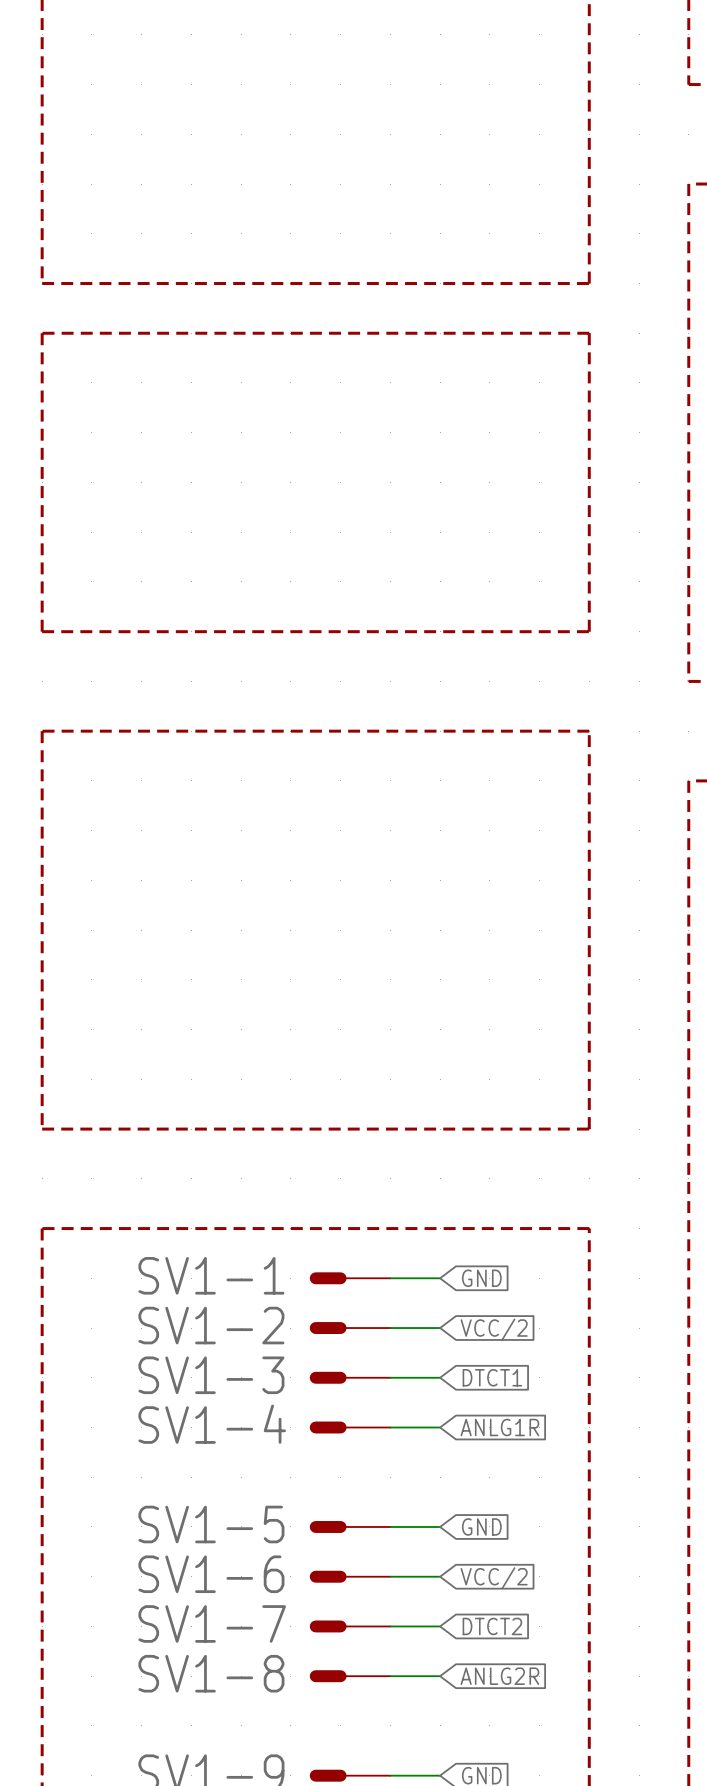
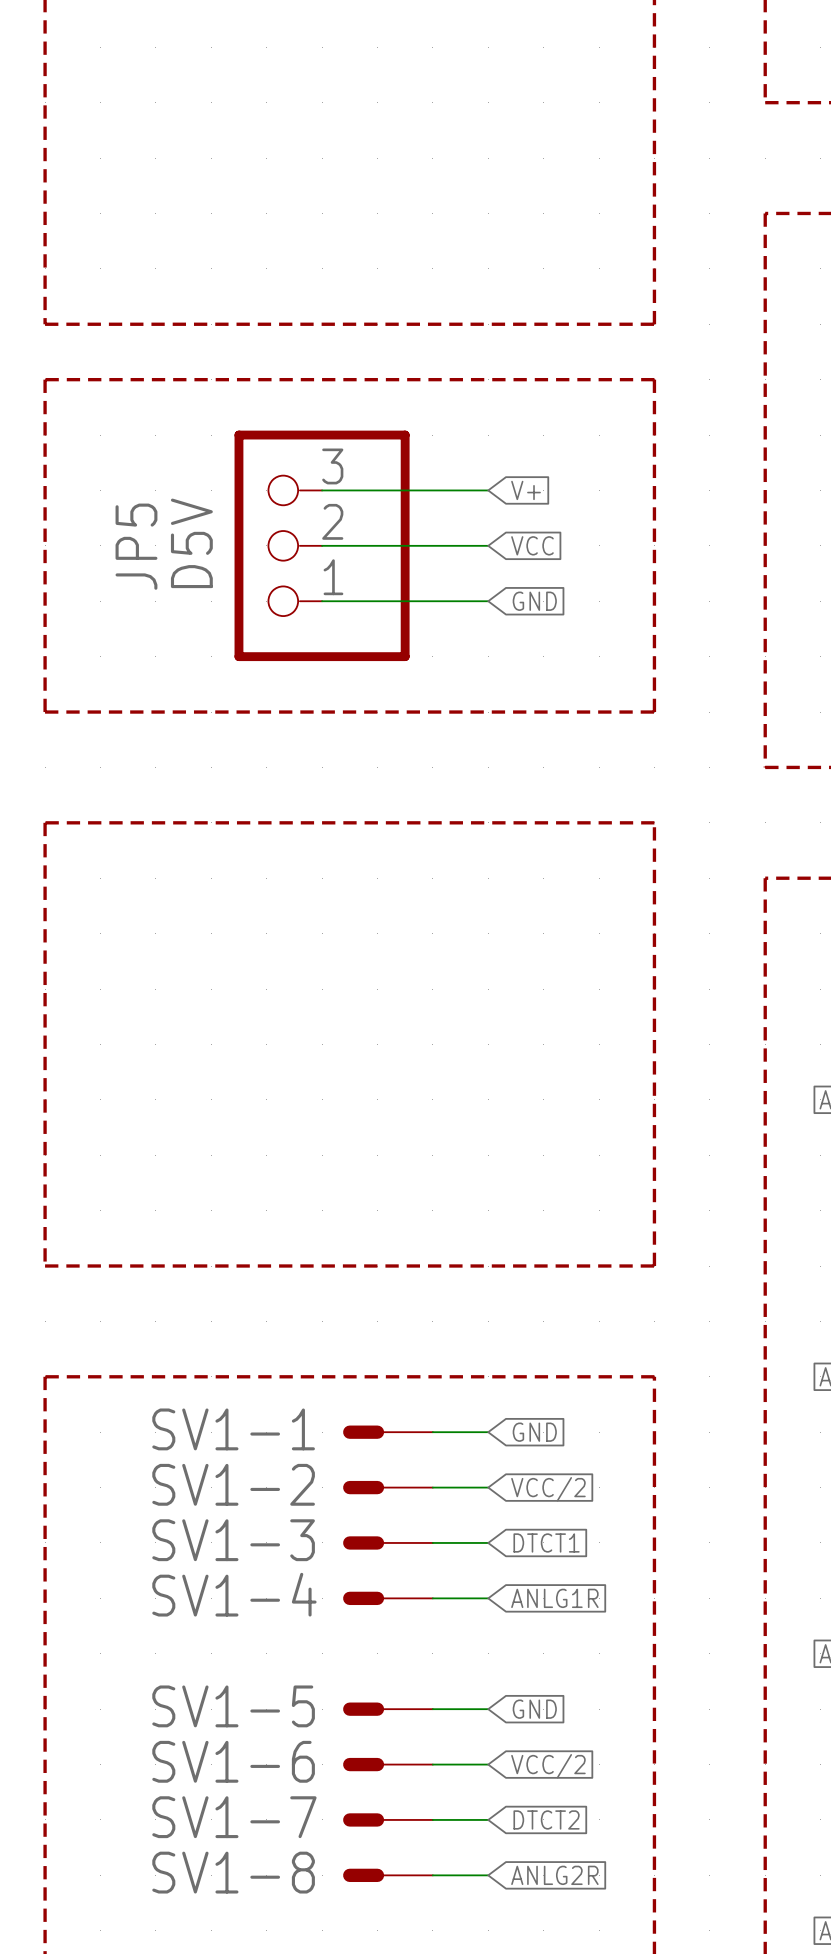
wire: none -> (322, 490) (488, 490)
global label: none -> V+ (526, 490)
wire: none -> (322, 545) (488, 545)
JP5: none -> D5V (322, 545)
global label: none -> VCC (532, 545)
wire: none -> (322, 601) (488, 601)
global label: none -> GND (534, 601)

